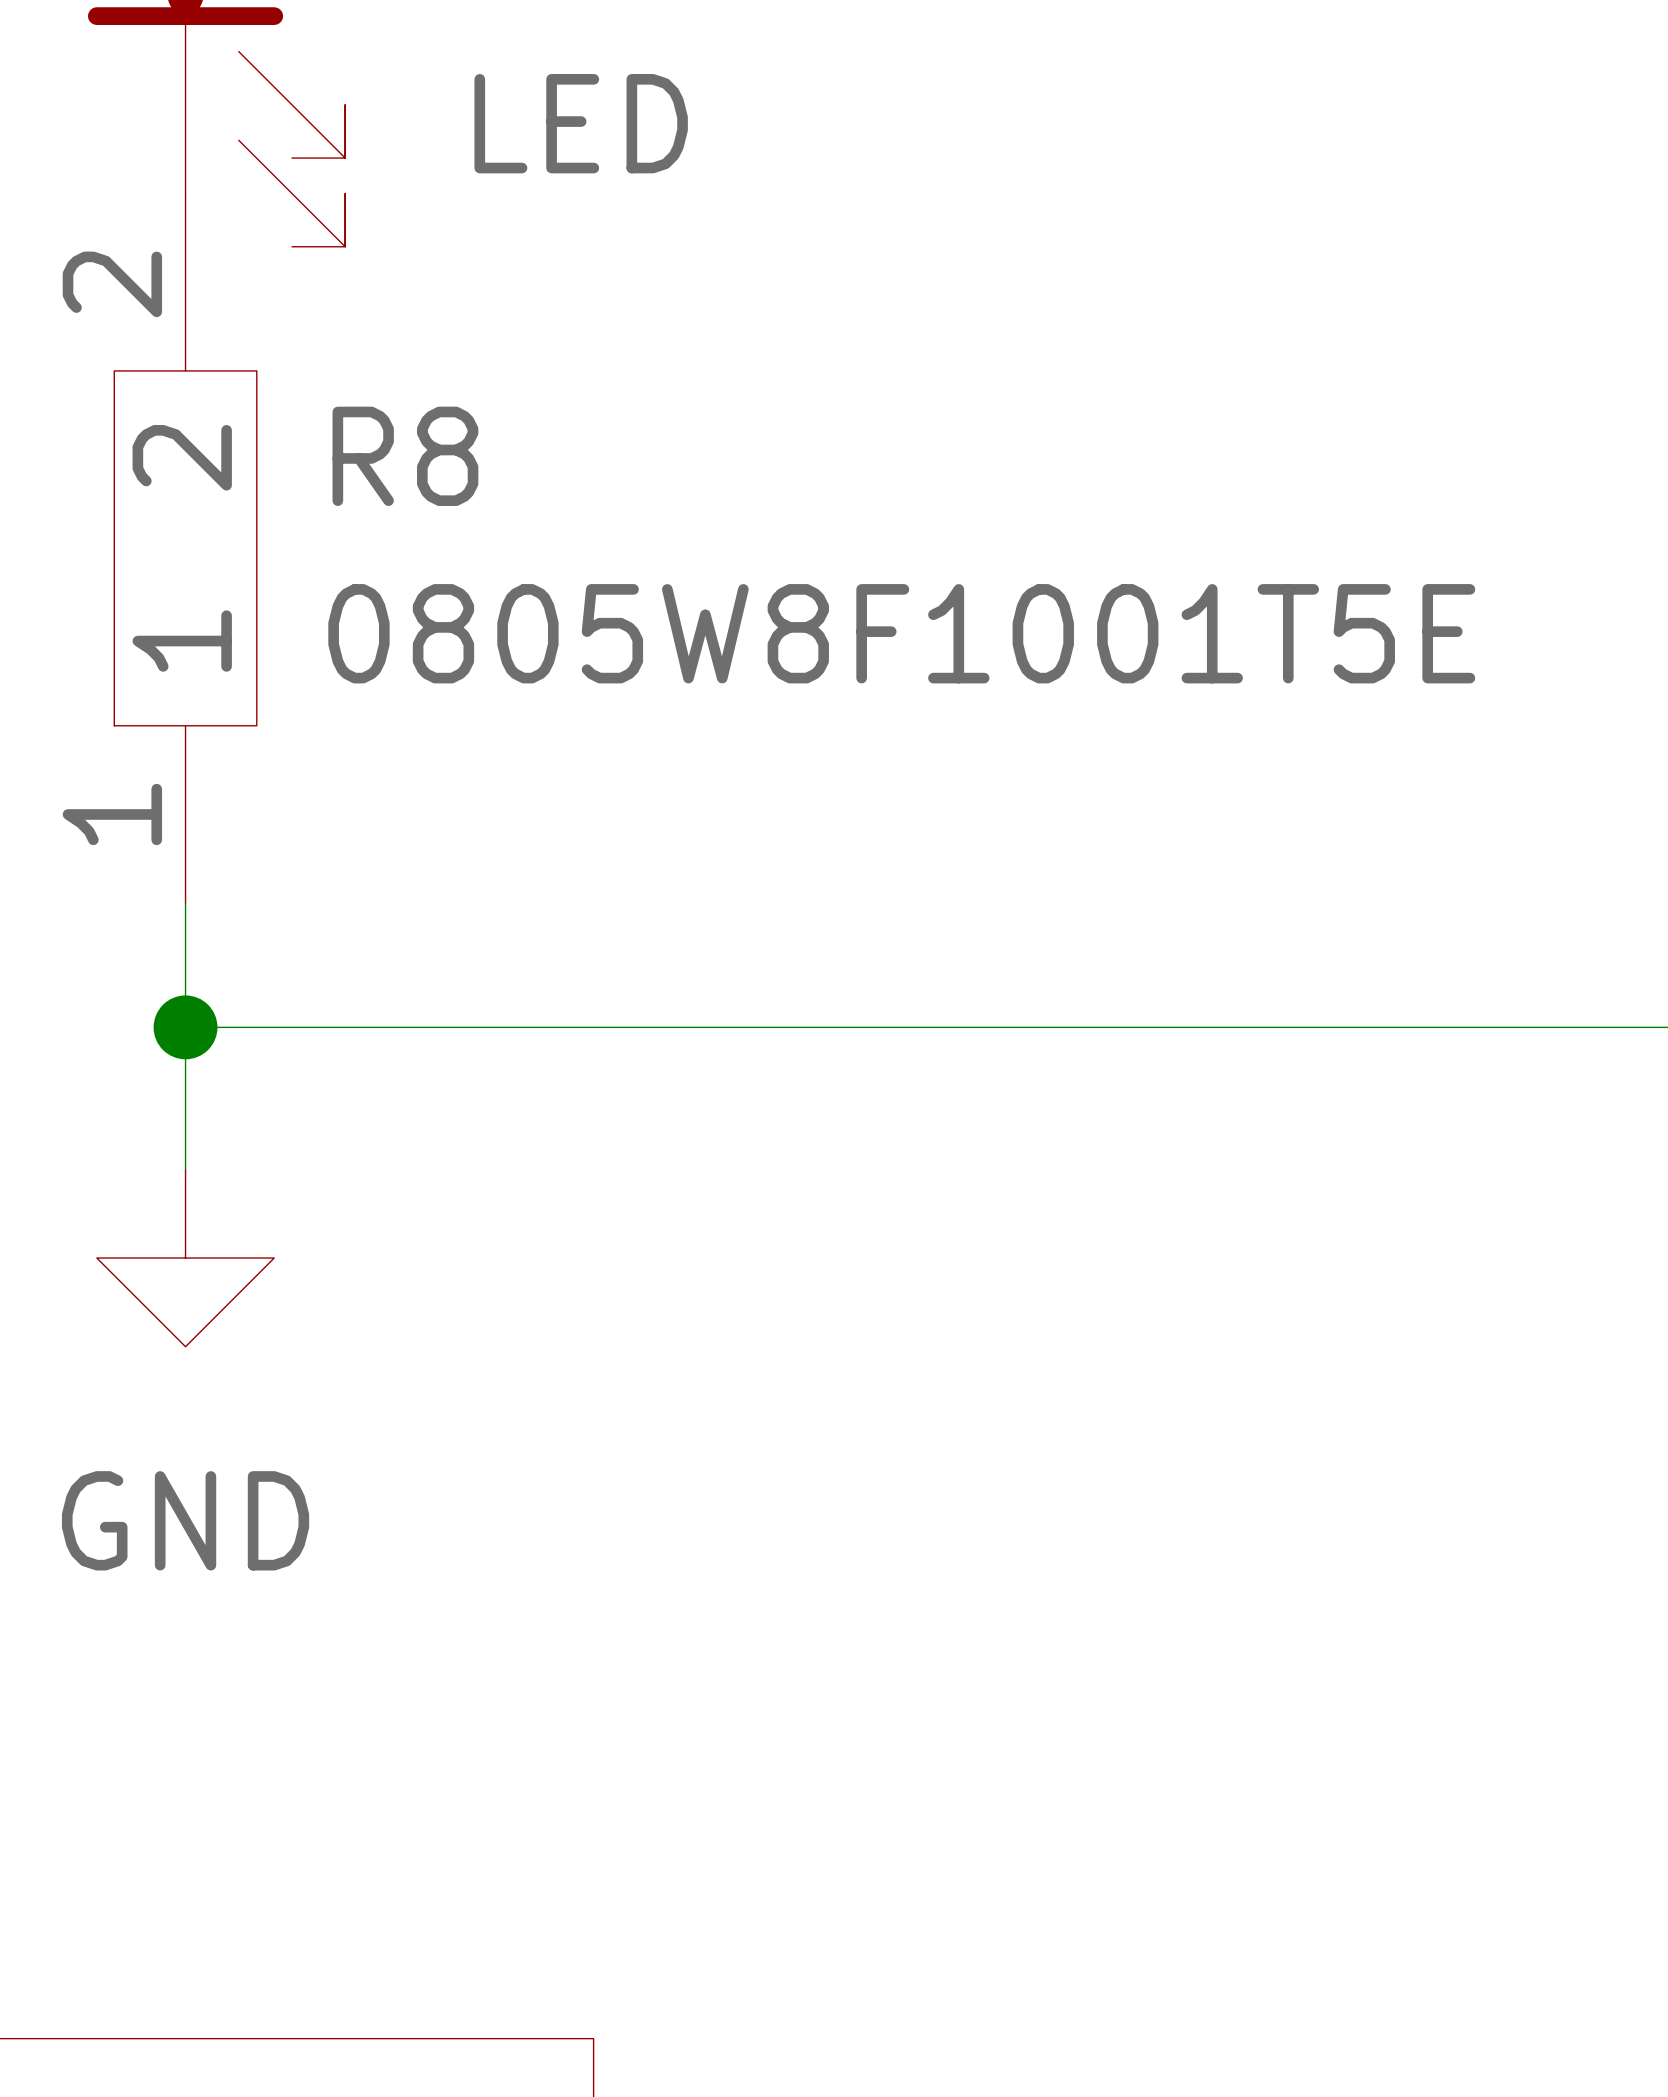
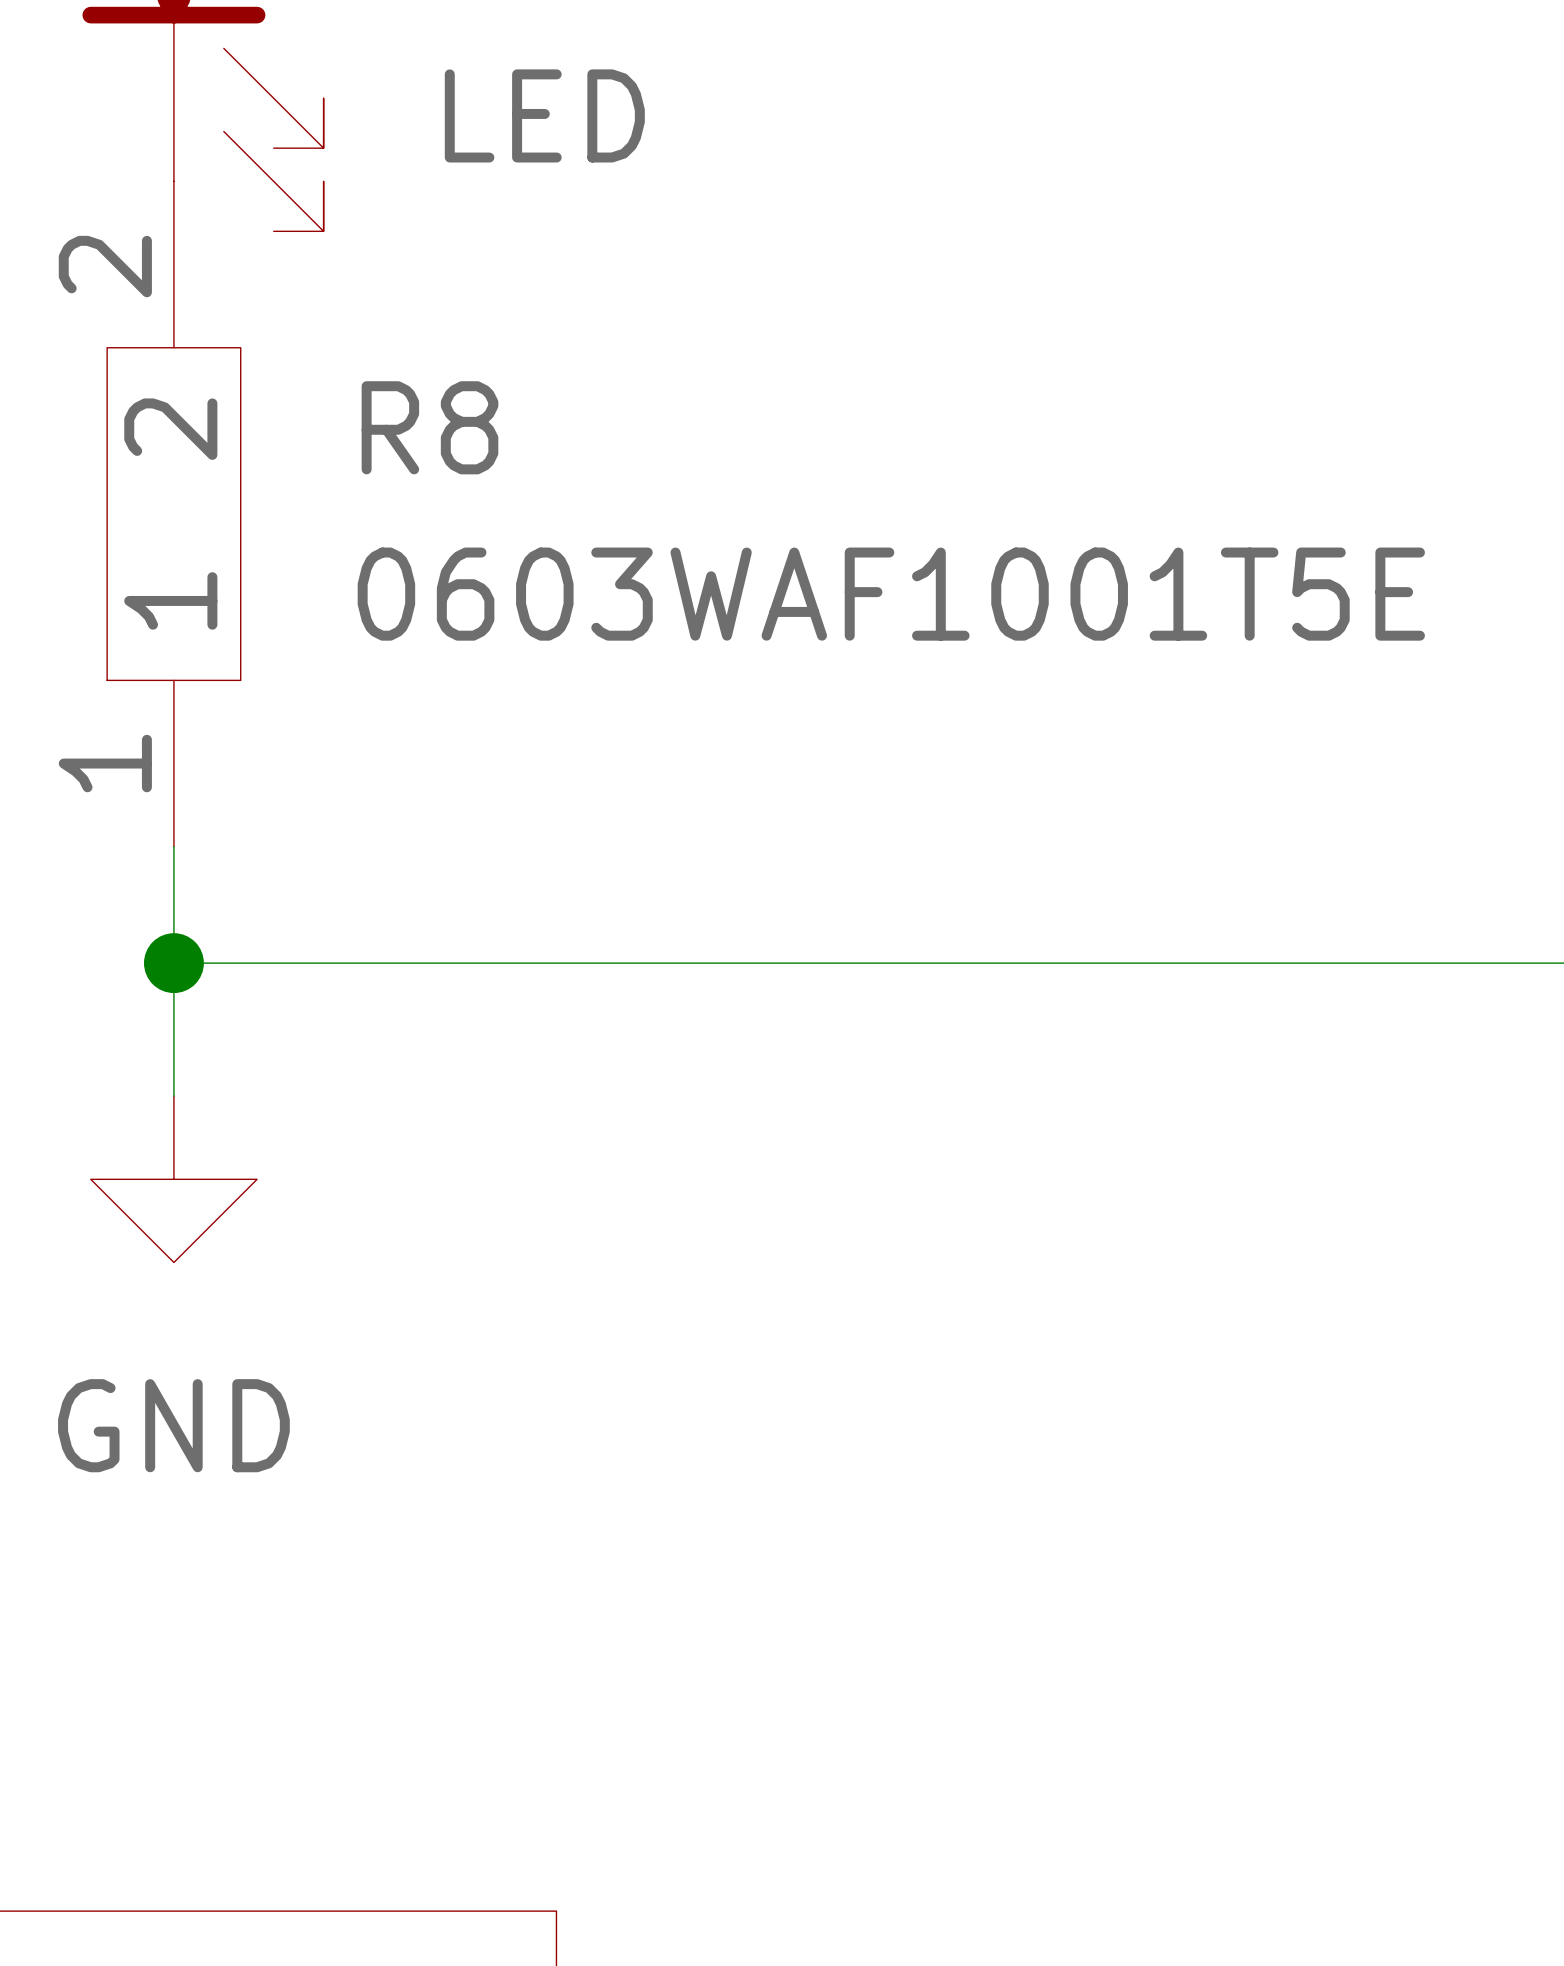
R8 name position: R8 (405, 456) -> R8 (429, 427)
R8 value: 0805W8F1001T5E (901, 633) -> 0603WAF1001T5E (891, 594)

